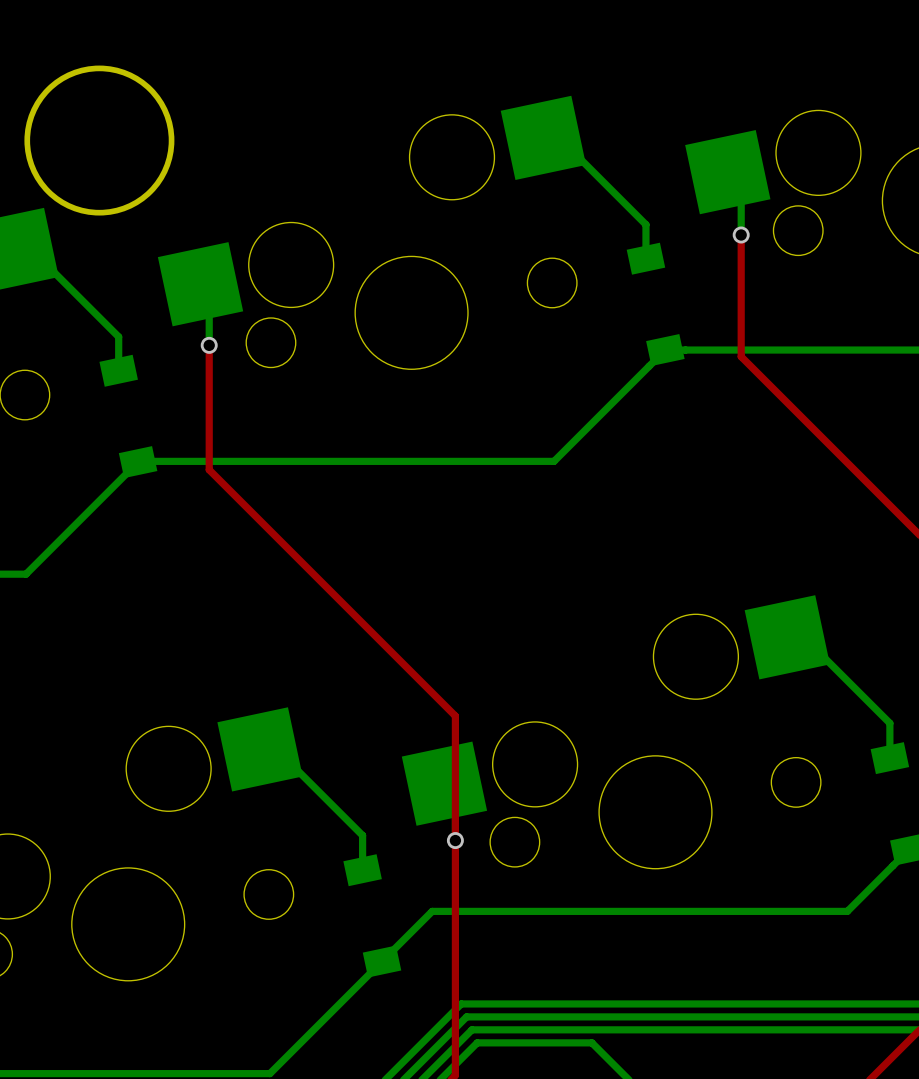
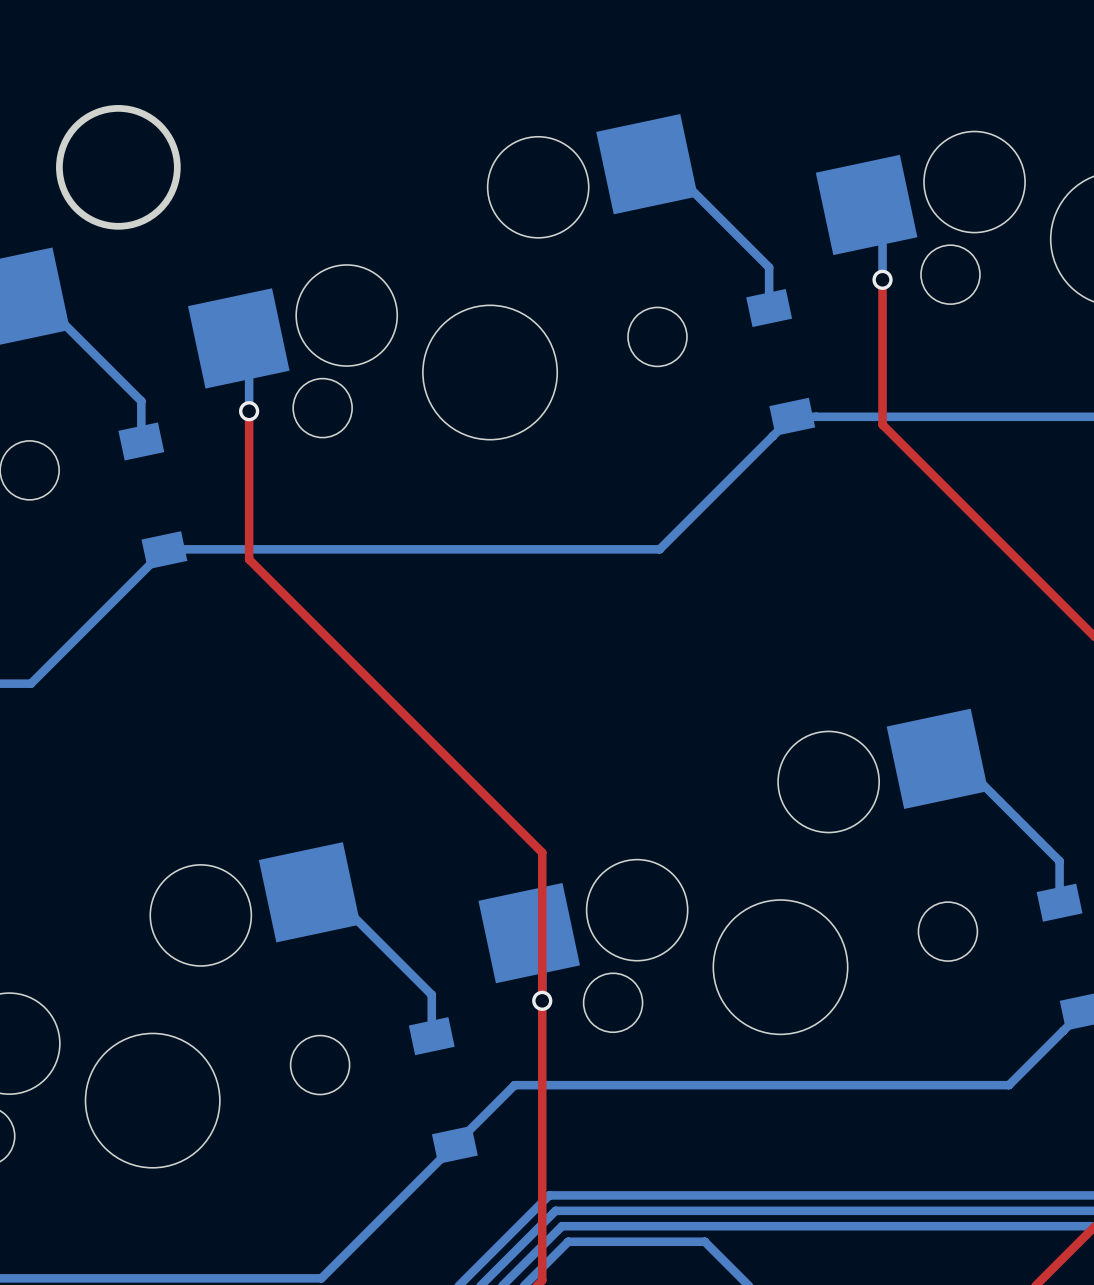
round board edge size: [24, 65, 175, 216] -> [56, 105, 181, 230]

